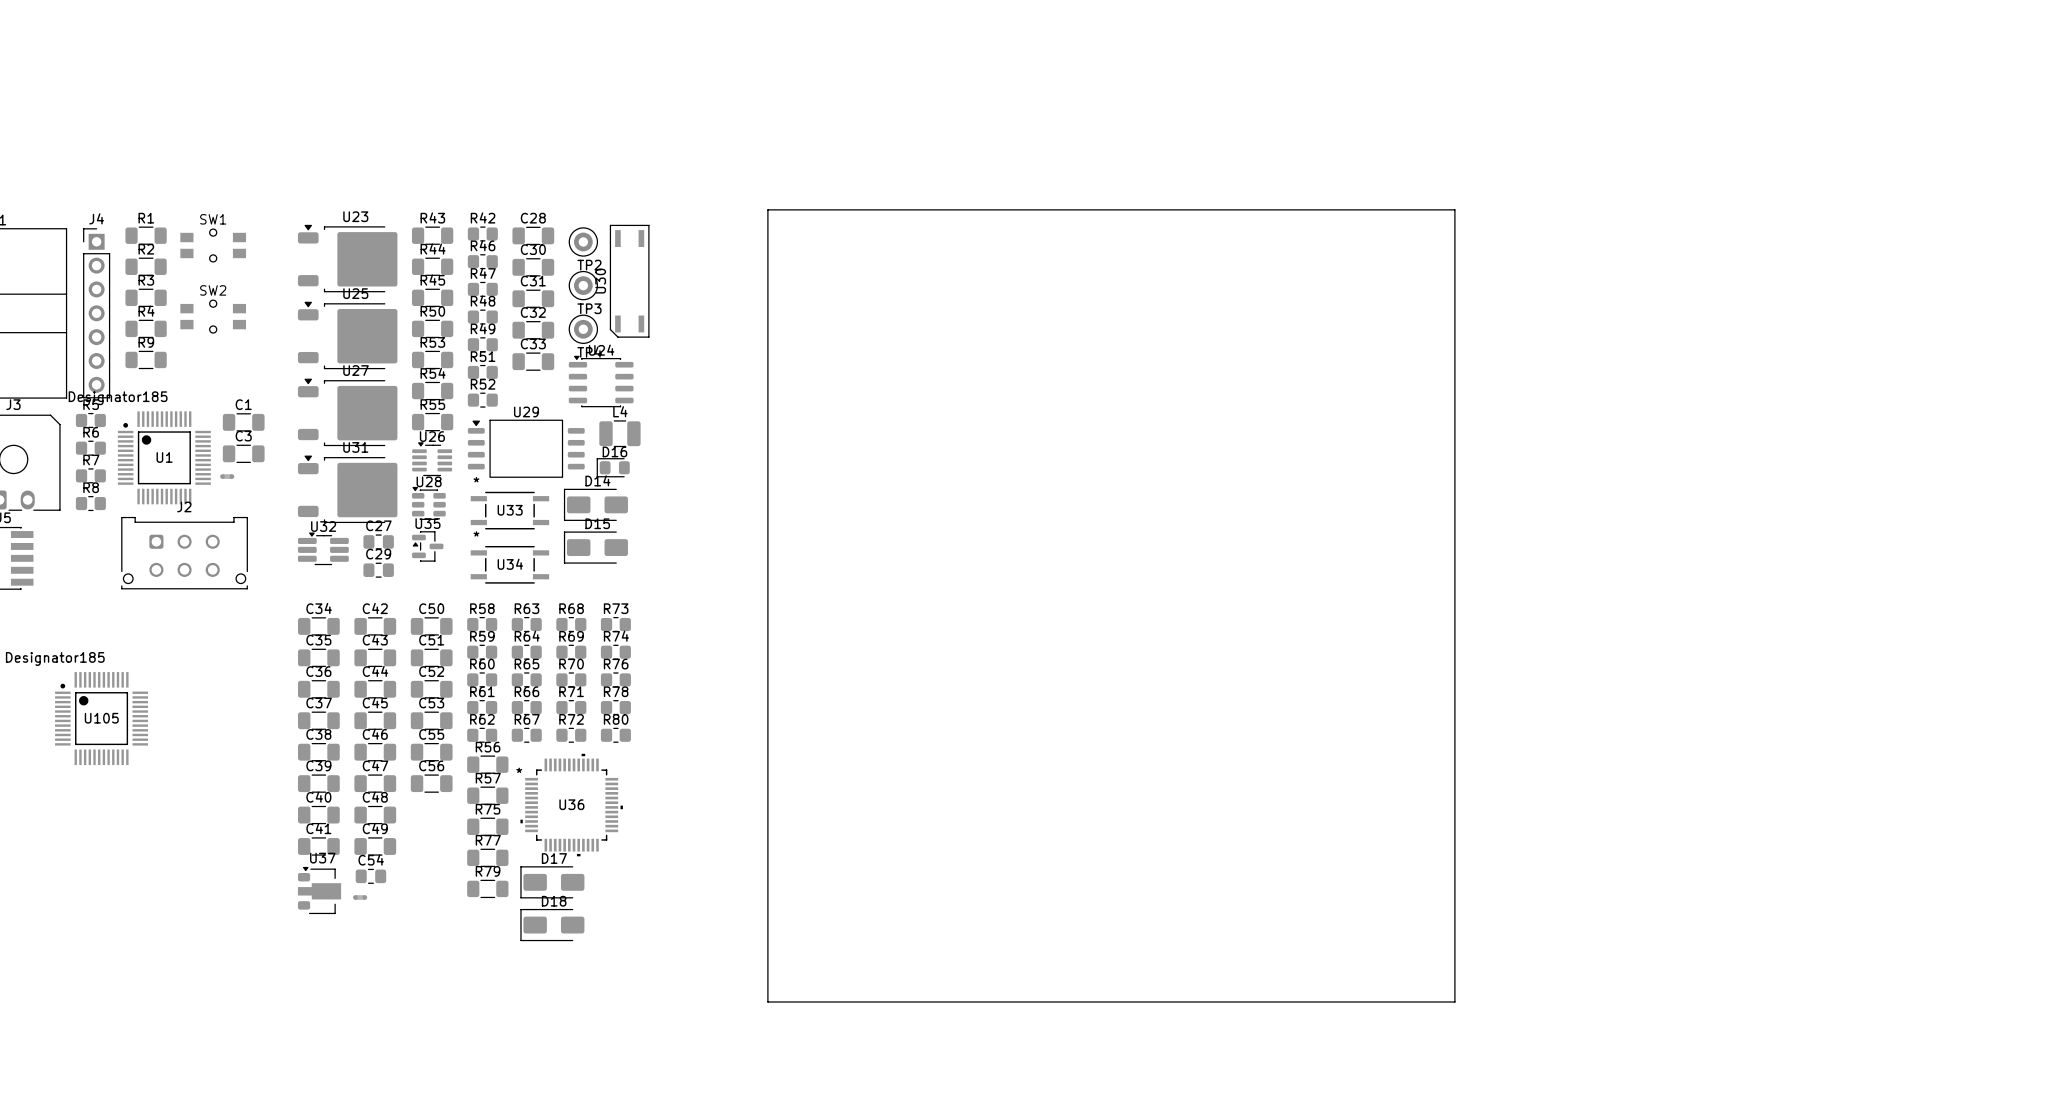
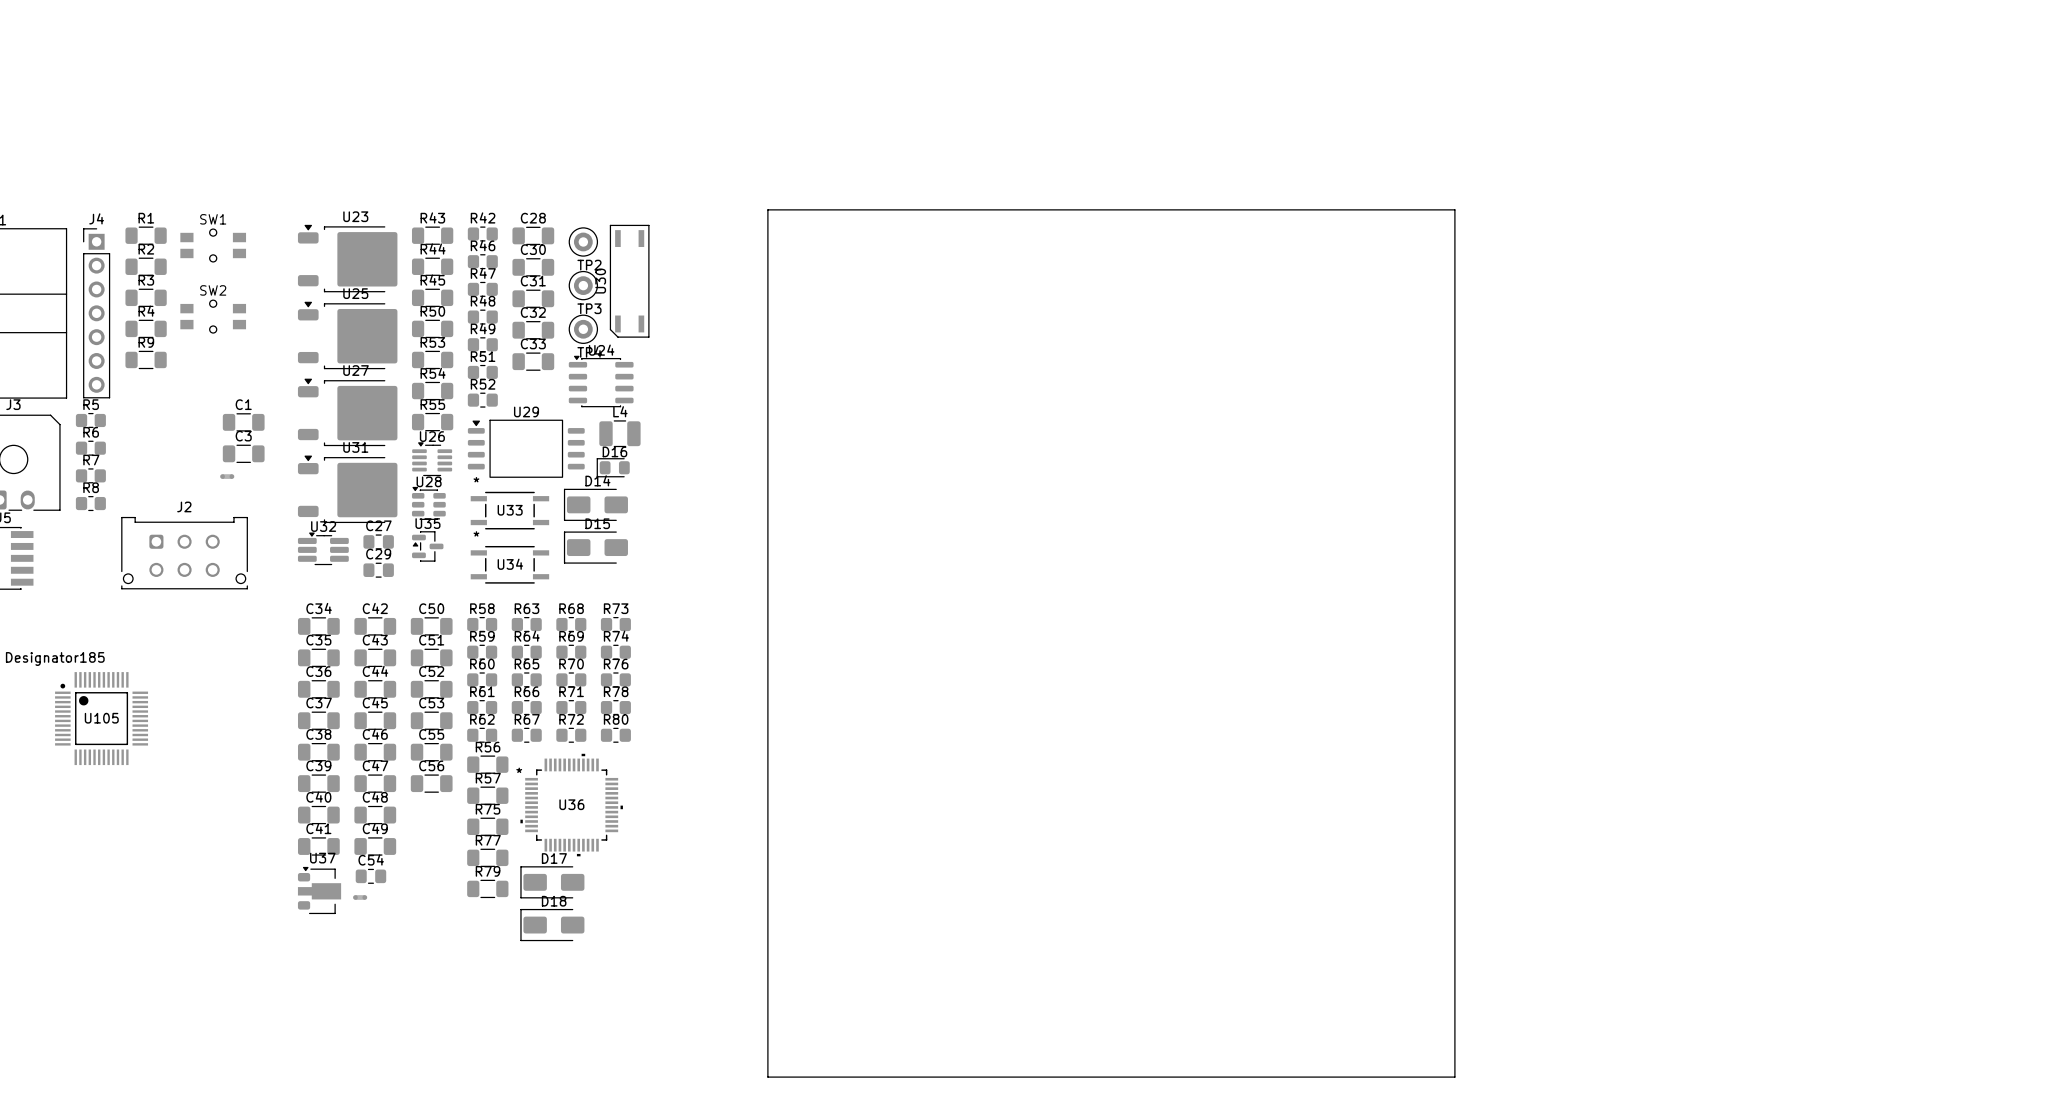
U1: (164, 457) -> none
board edge: (767, 1002) (1454, 1002) -> (767, 1002) (767, 1077) (1454, 1077) (1454, 1002)

